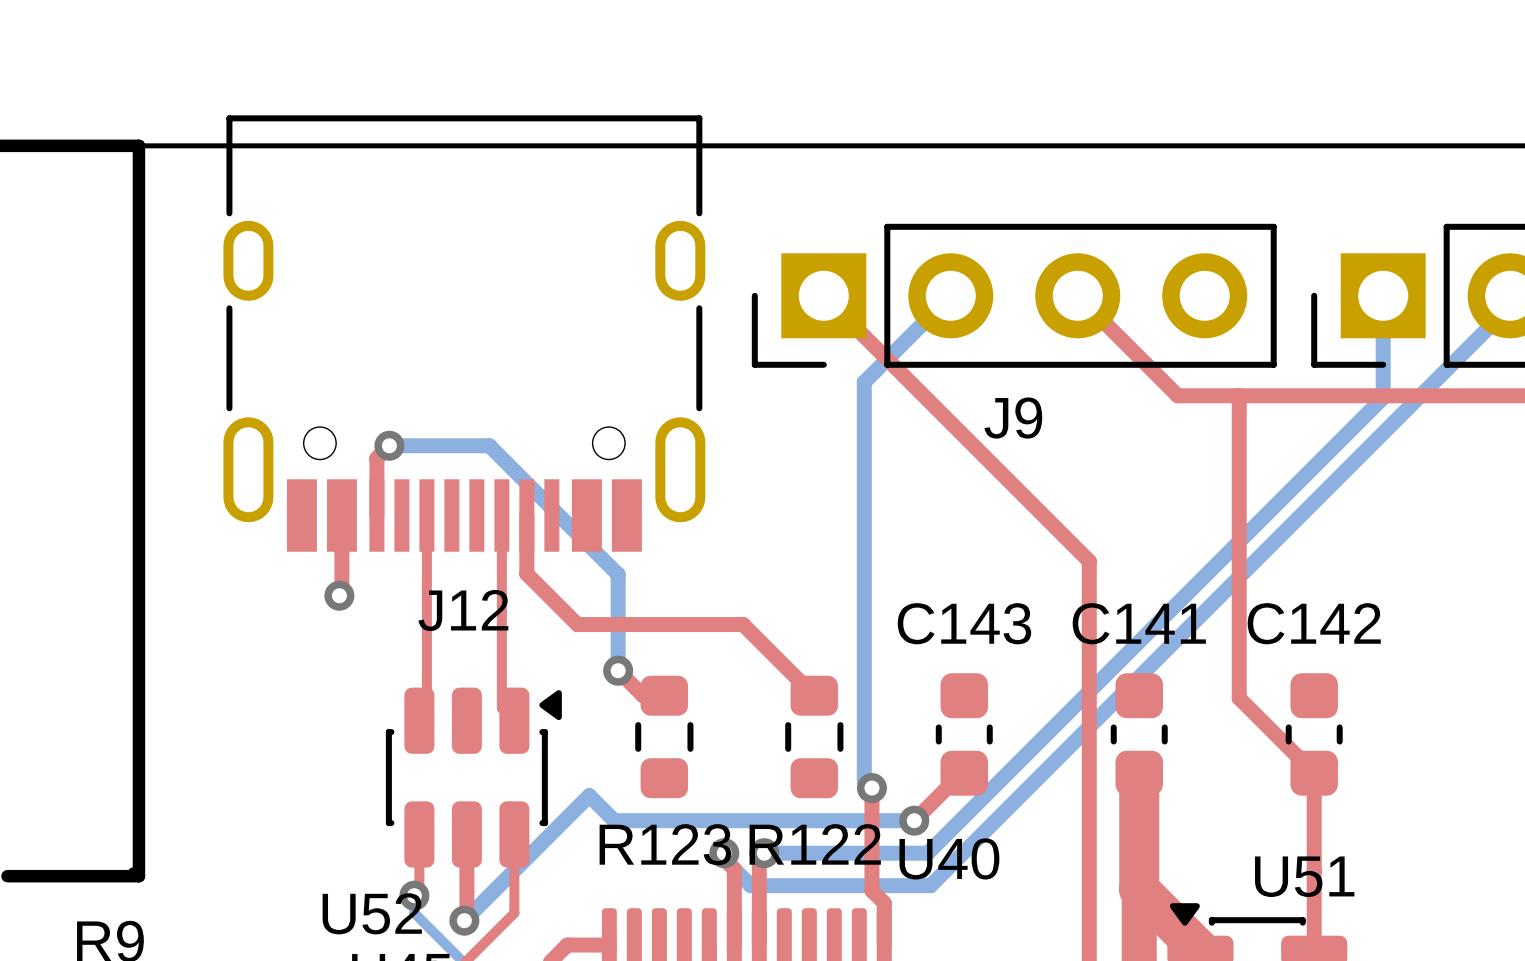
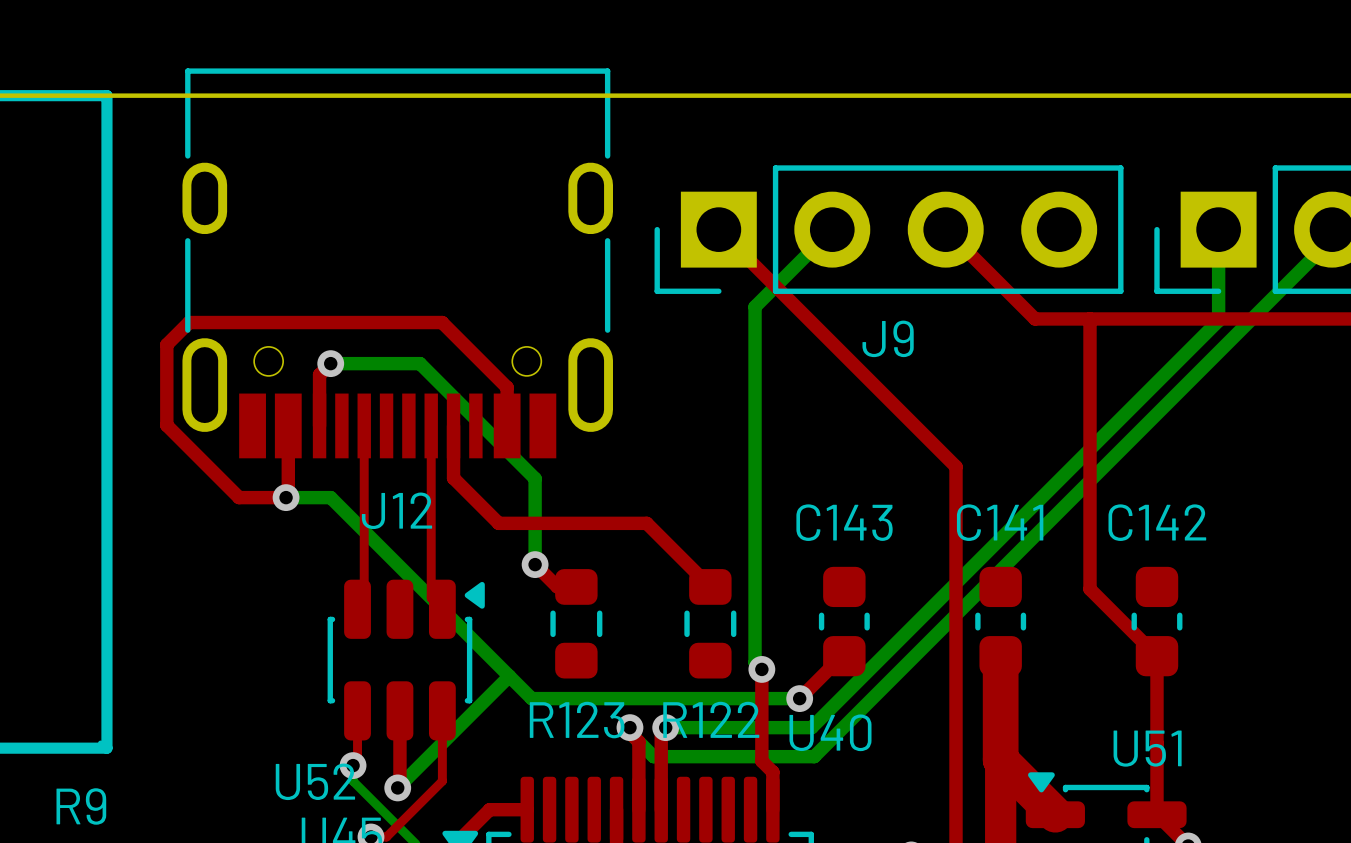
top track: none -> (507, 425) (507, 387) (442, 322) (189, 322) (166, 344) (166, 425) (239, 497) (286, 497)
bottom track: none -> (286, 497) (330, 497) (509, 676)

